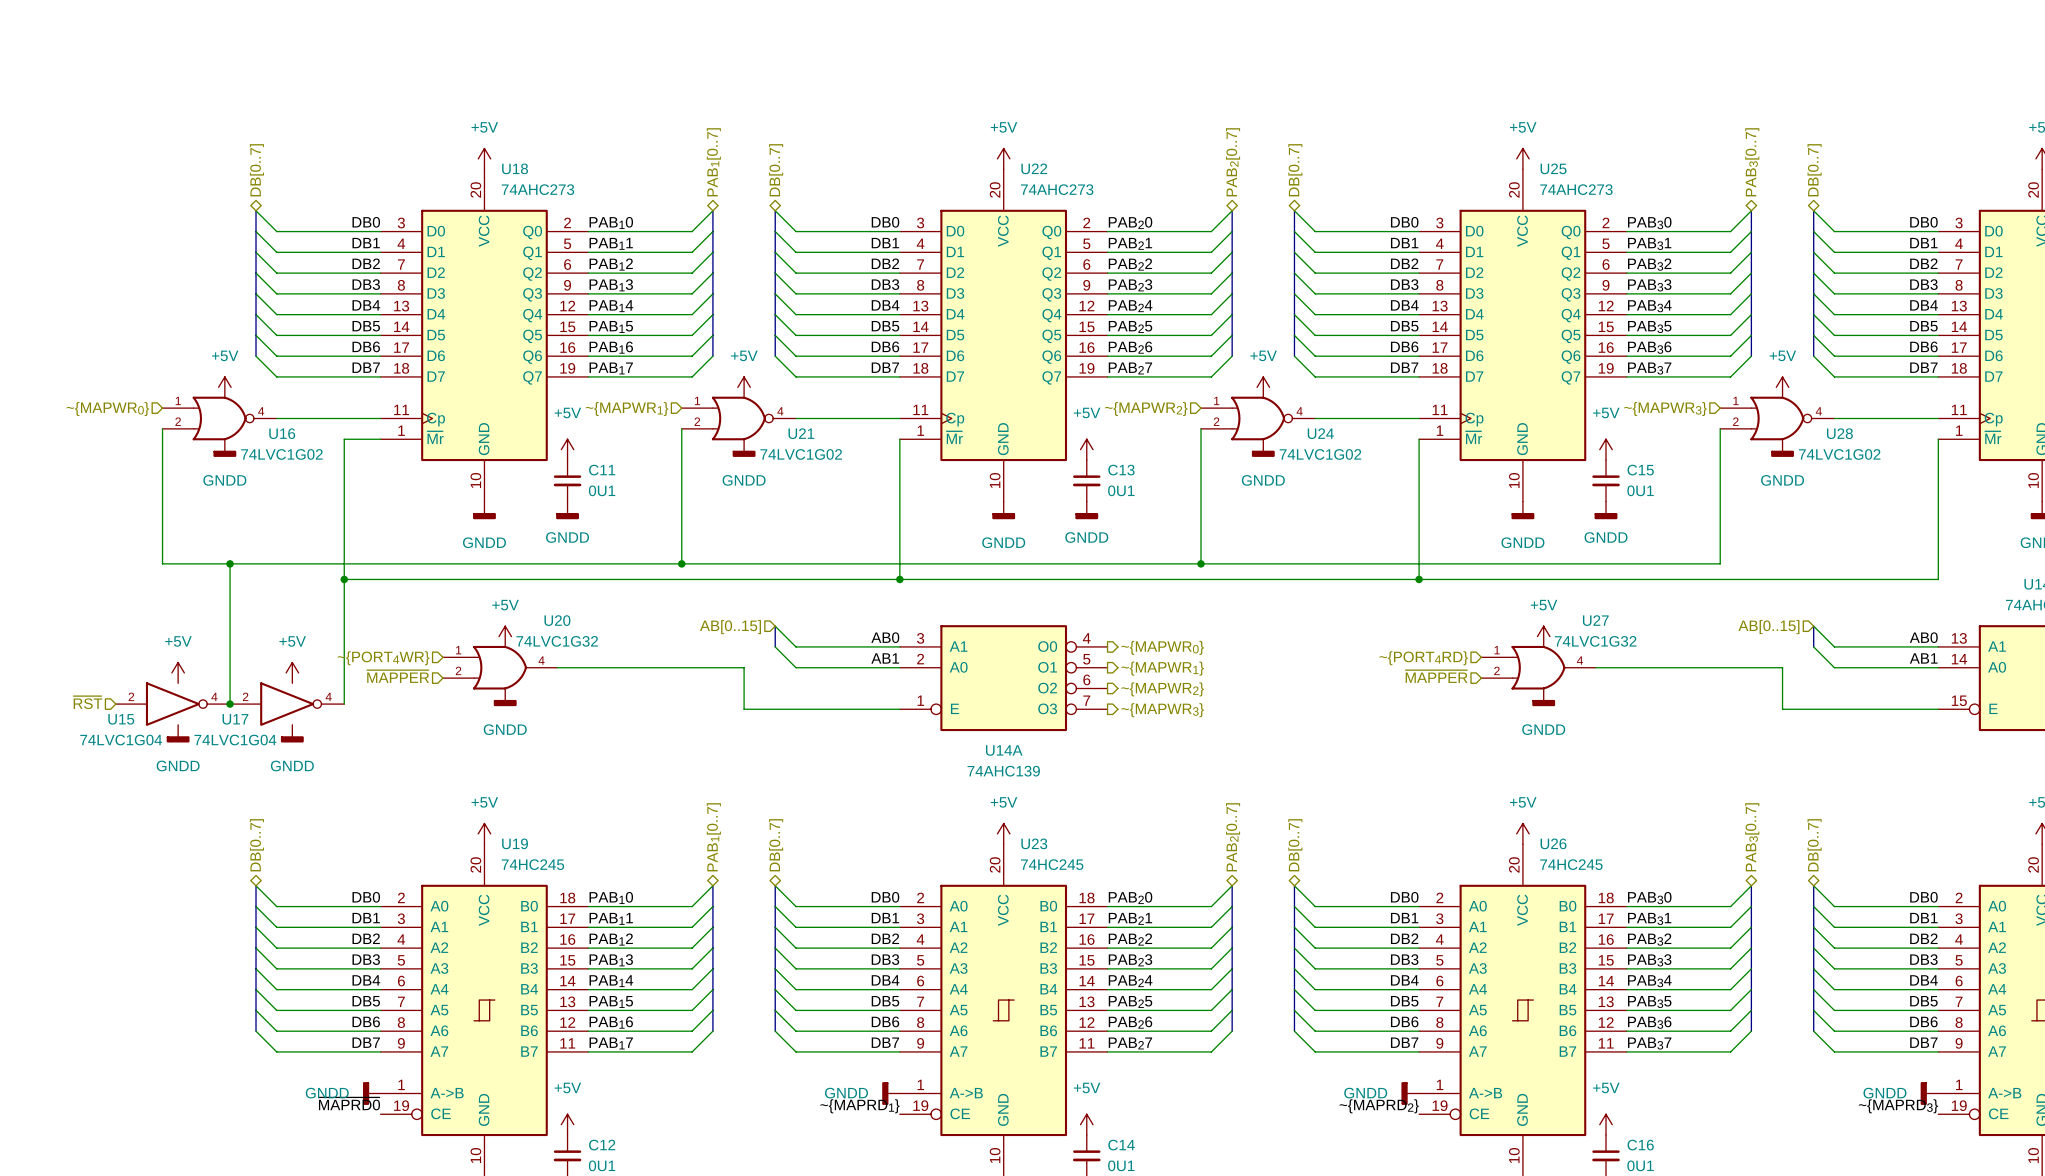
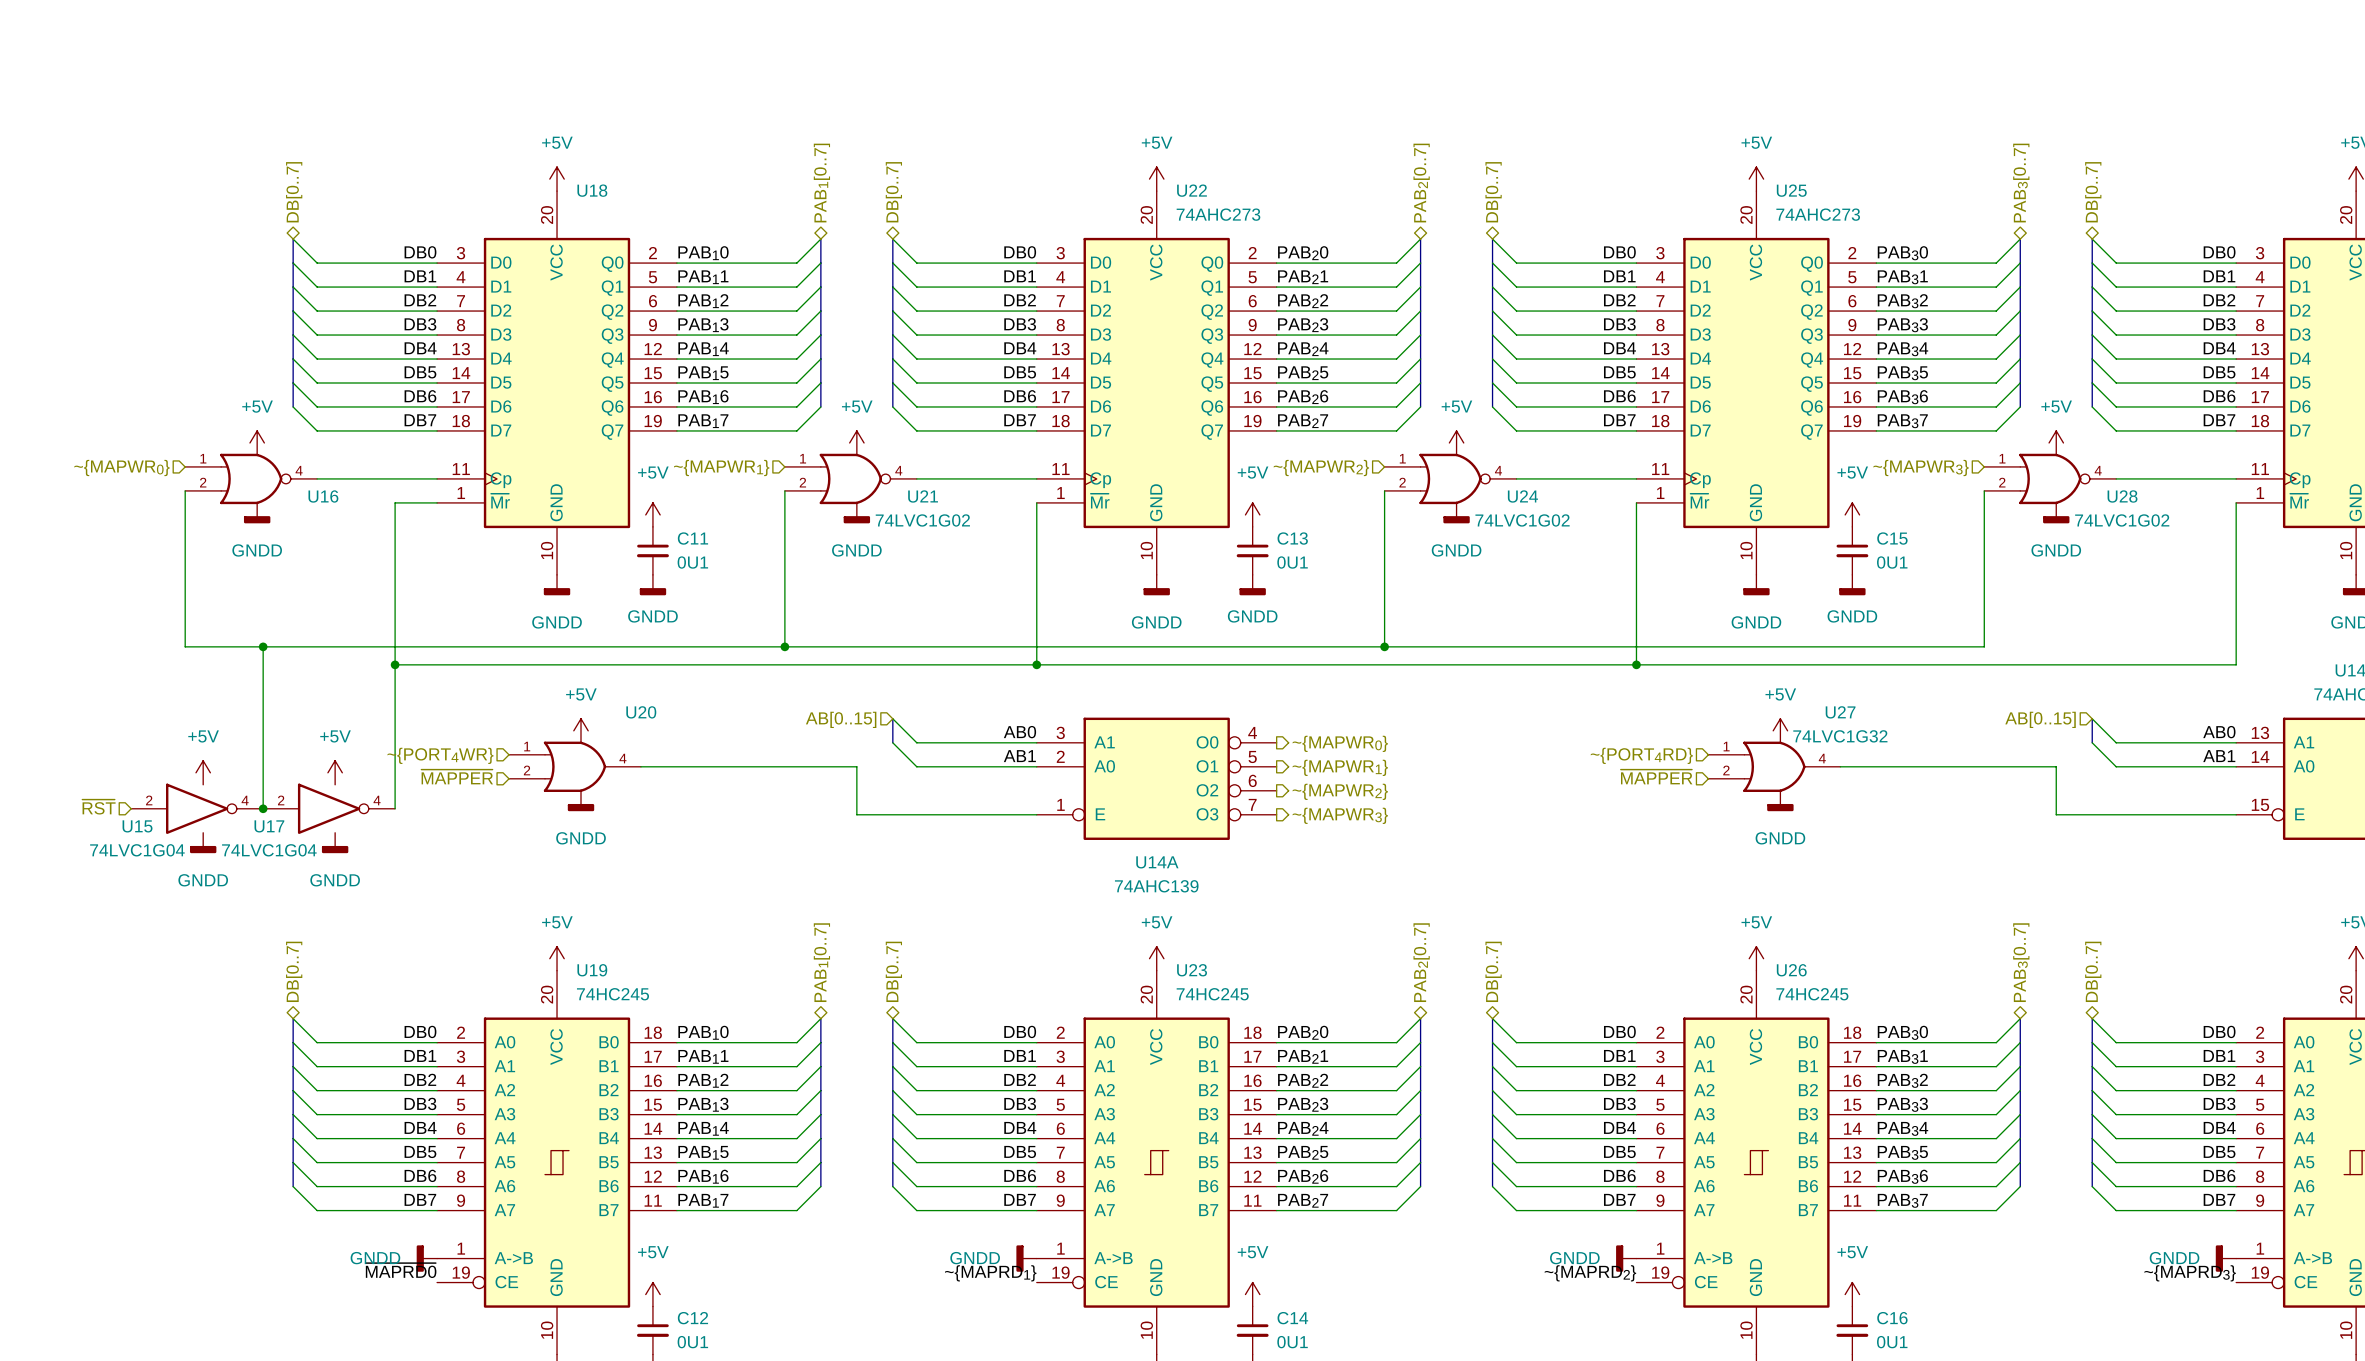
U18 value: 74AHC273 (537, 189) -> none
U16 value: 74LVC1G02 (281, 454) -> none
U20 value: 74LVC1G32 (557, 641) -> none

